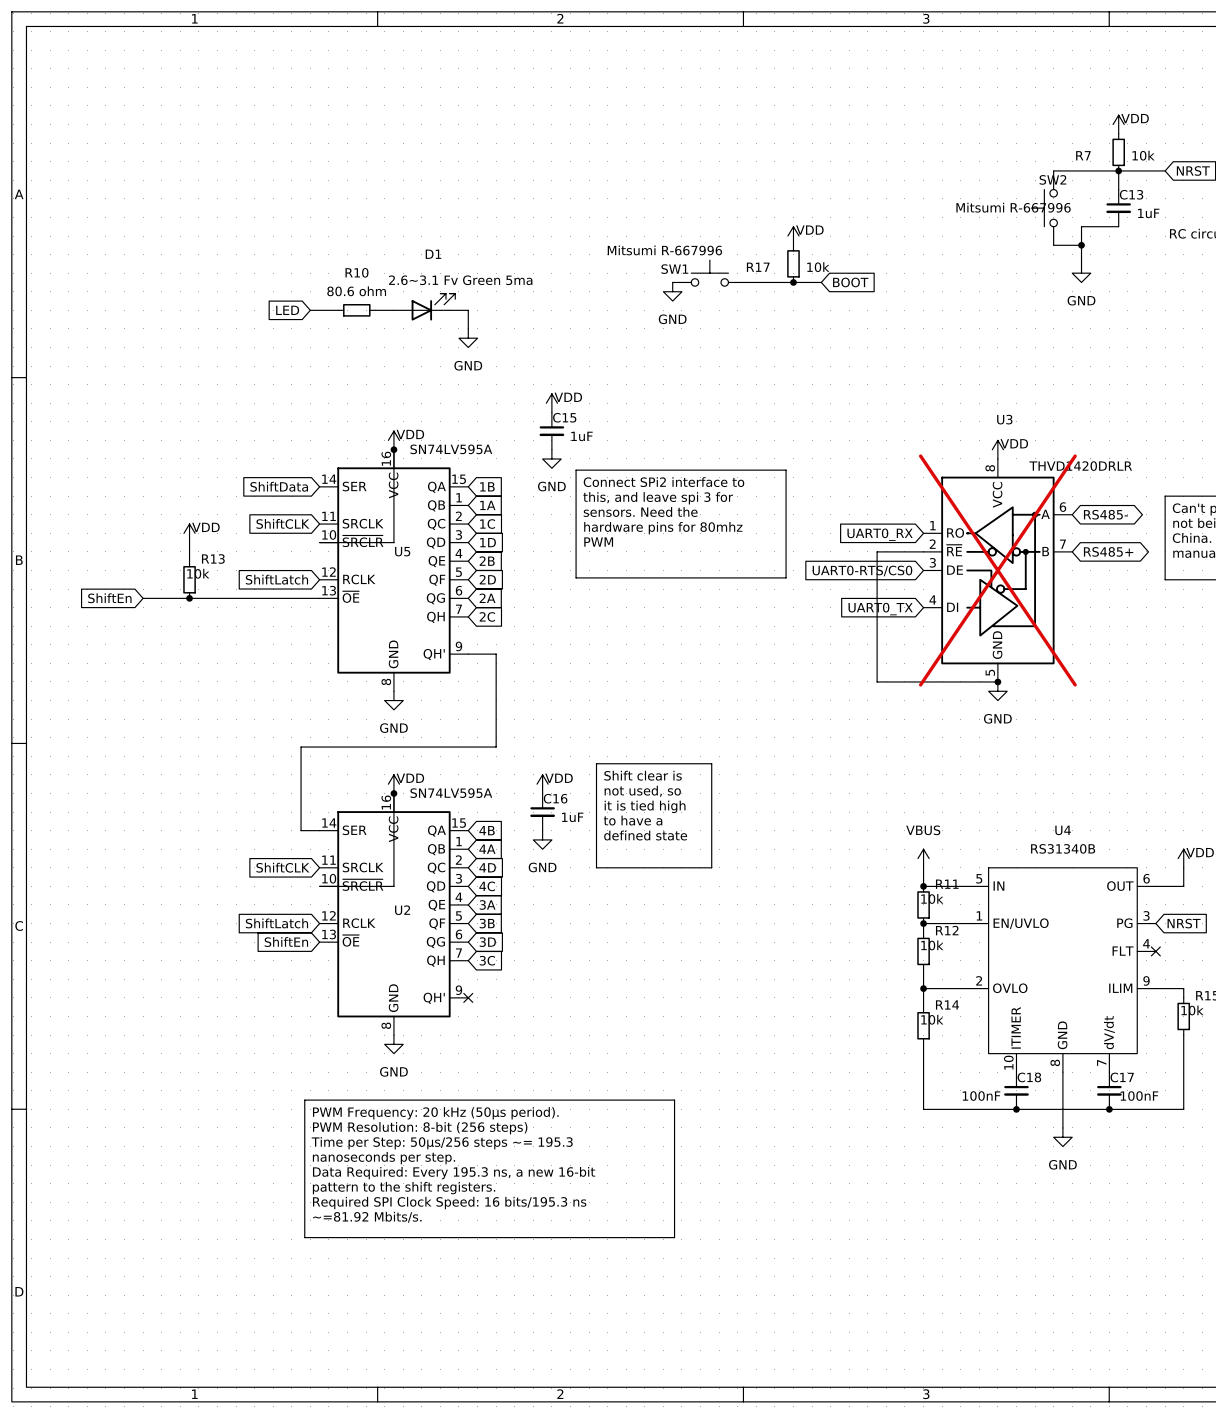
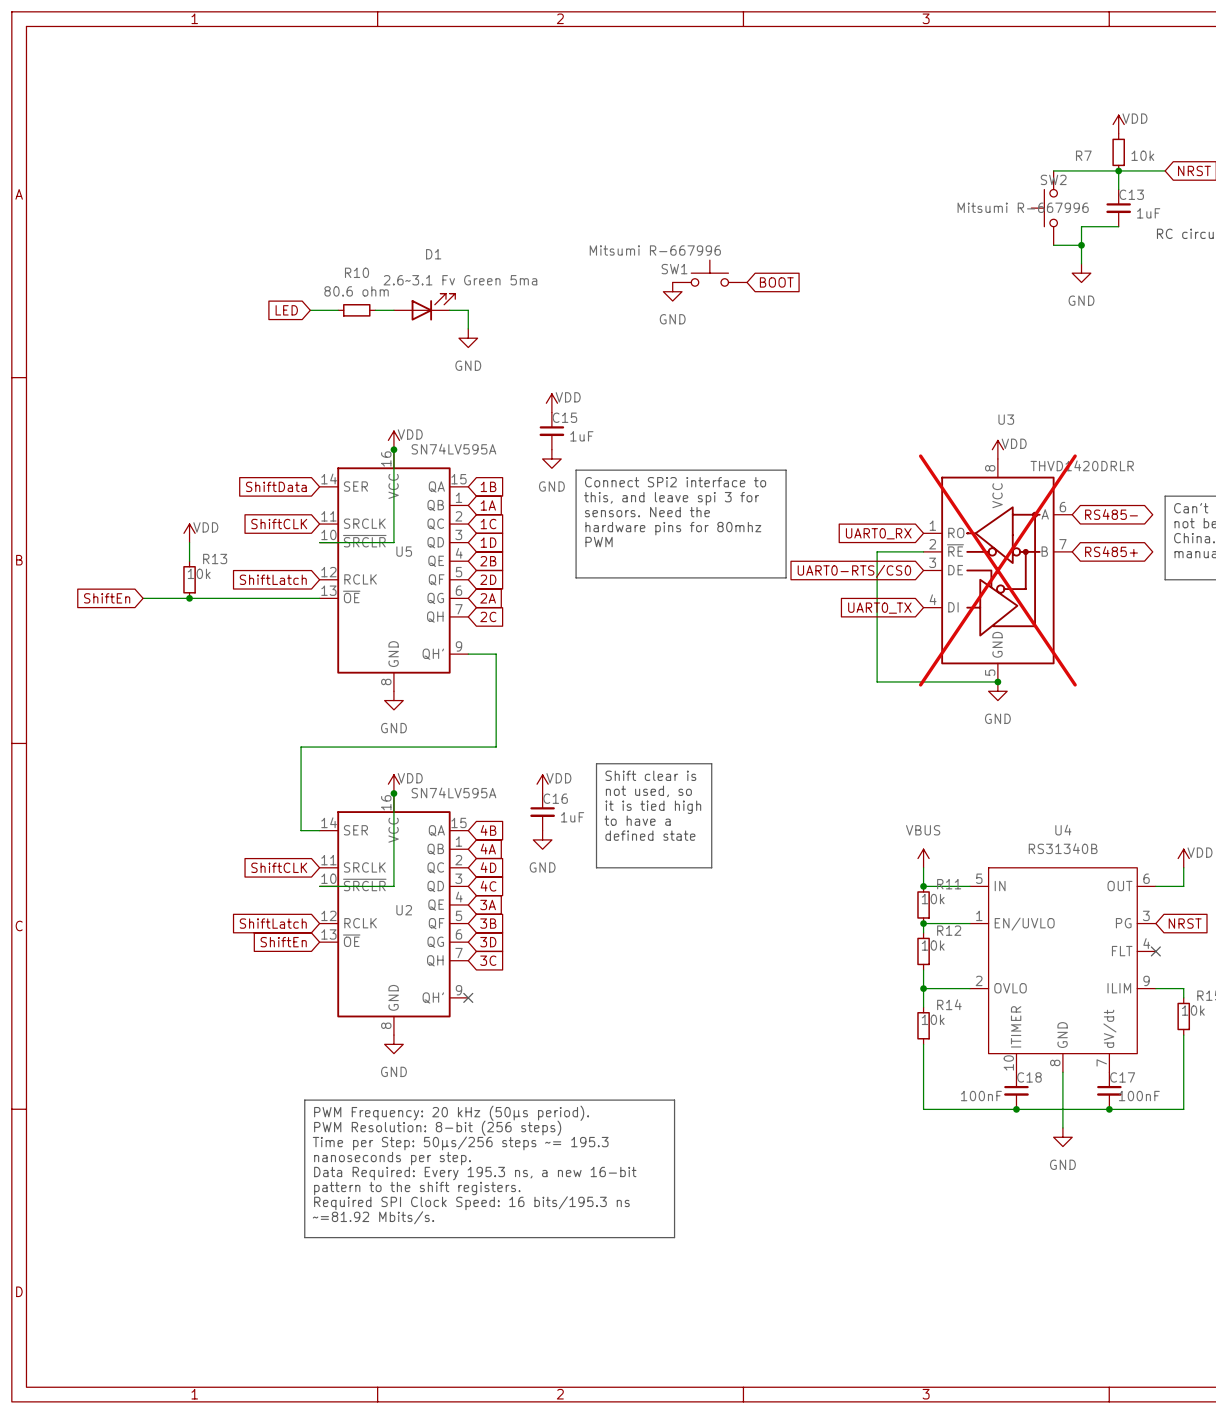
power symbol: VDD (793, 236) -> none
R17: 10k (793, 263) -> none
wire: (747, 282) (821, 282) -> none
junction: (793, 282) -> none
global label position: BOOT (850, 282) -> BOOT (776, 282)

